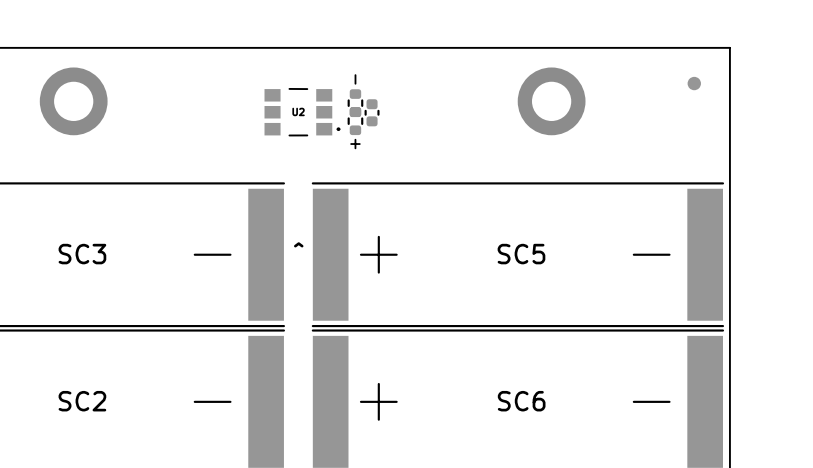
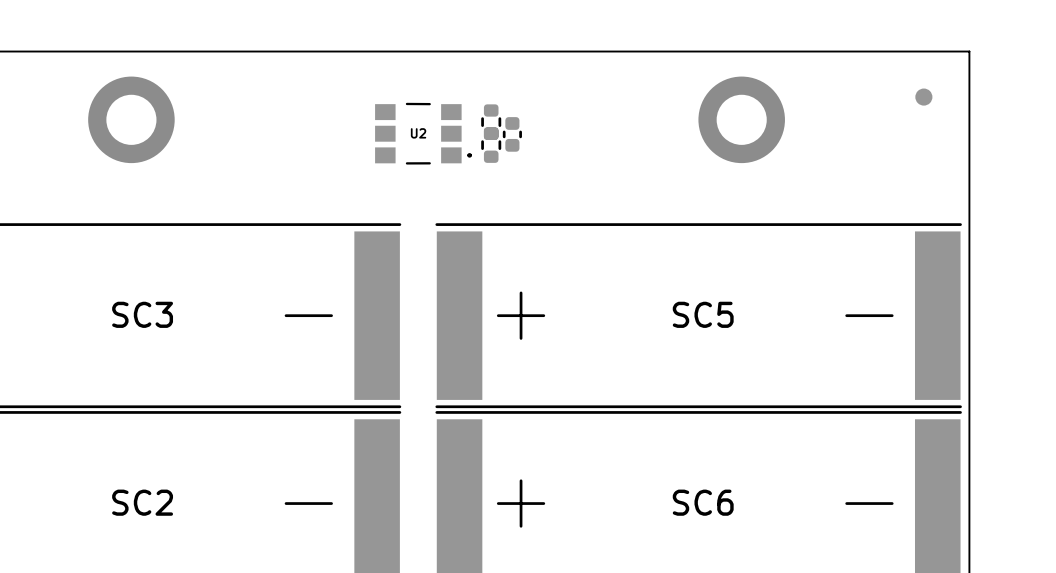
text: - (355, 79) -> none
text: + (355, 144) -> none
text: ^ (298, 244) -> none

